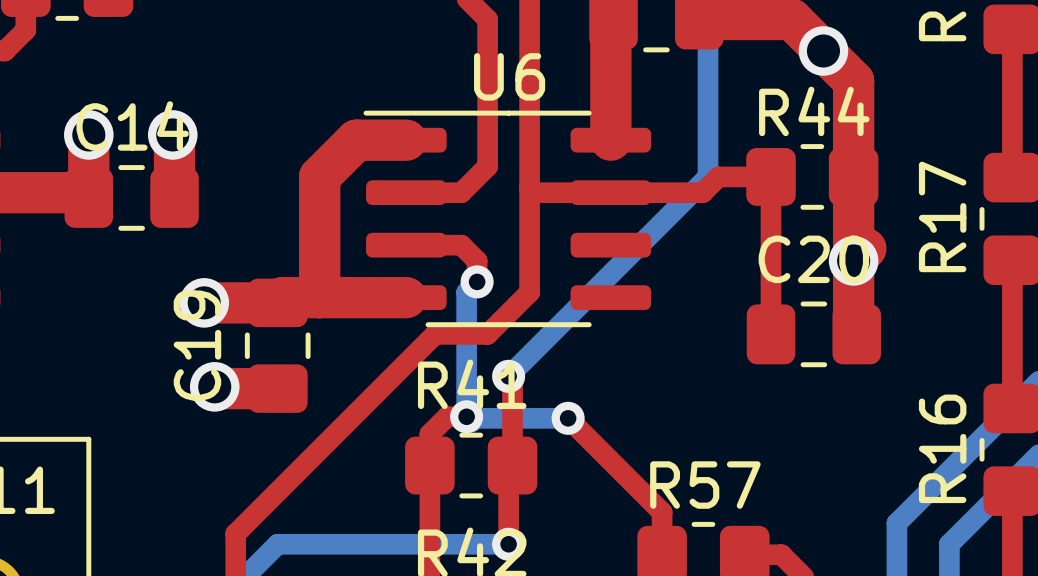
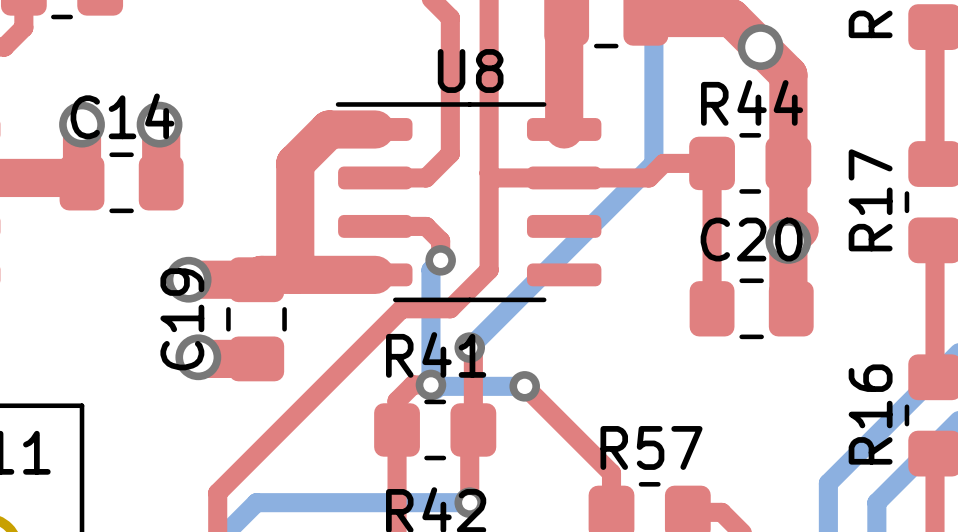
U6 name: U6 (509, 76) -> U8 (470, 71)

